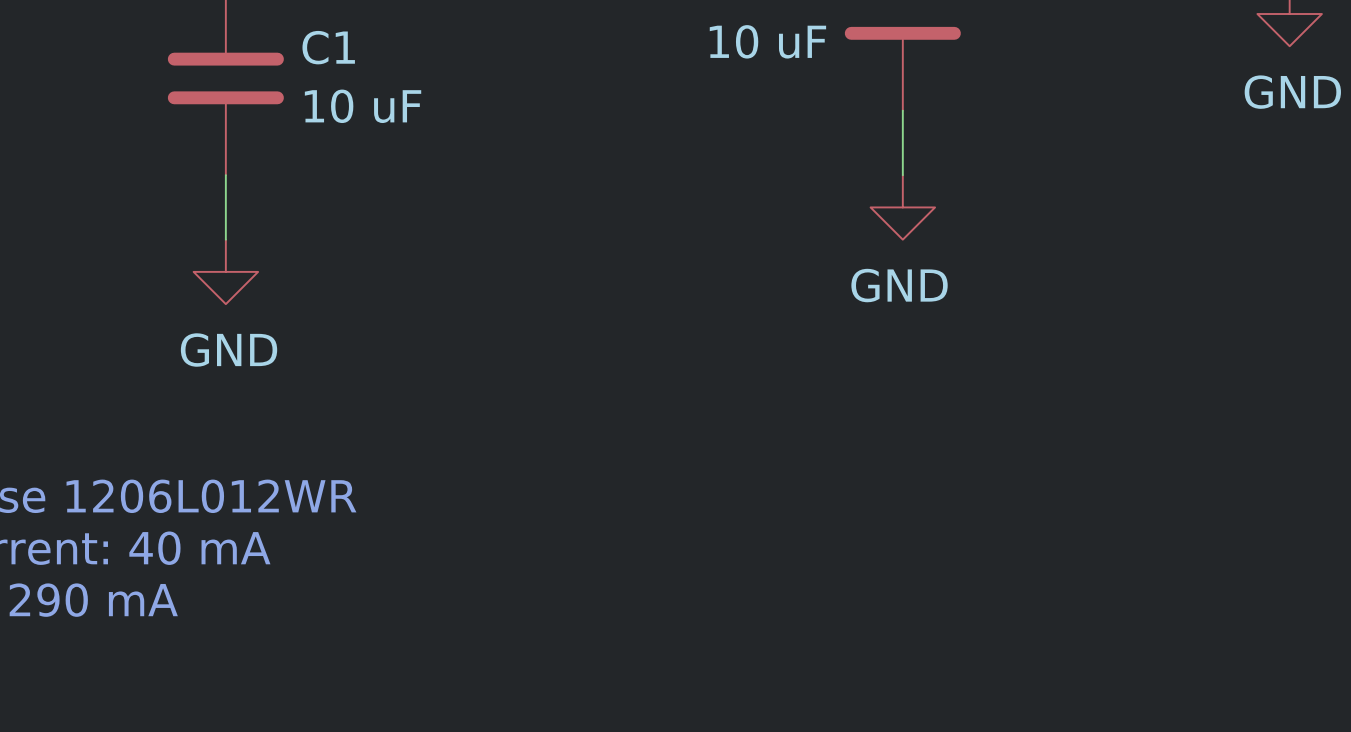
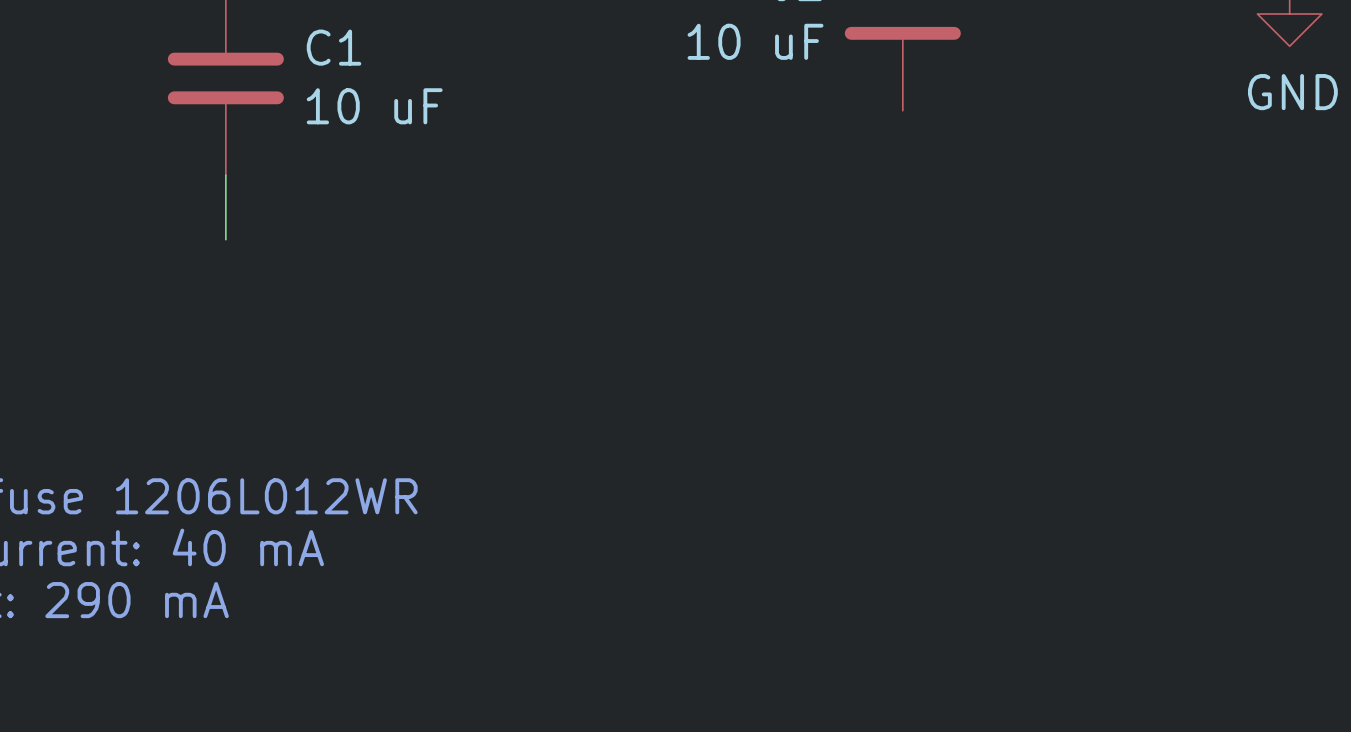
wire: (902, 110) (902, 175) -> none
power symbol: GND (902, 207) -> none
power symbol: GND (225, 271) -> none

